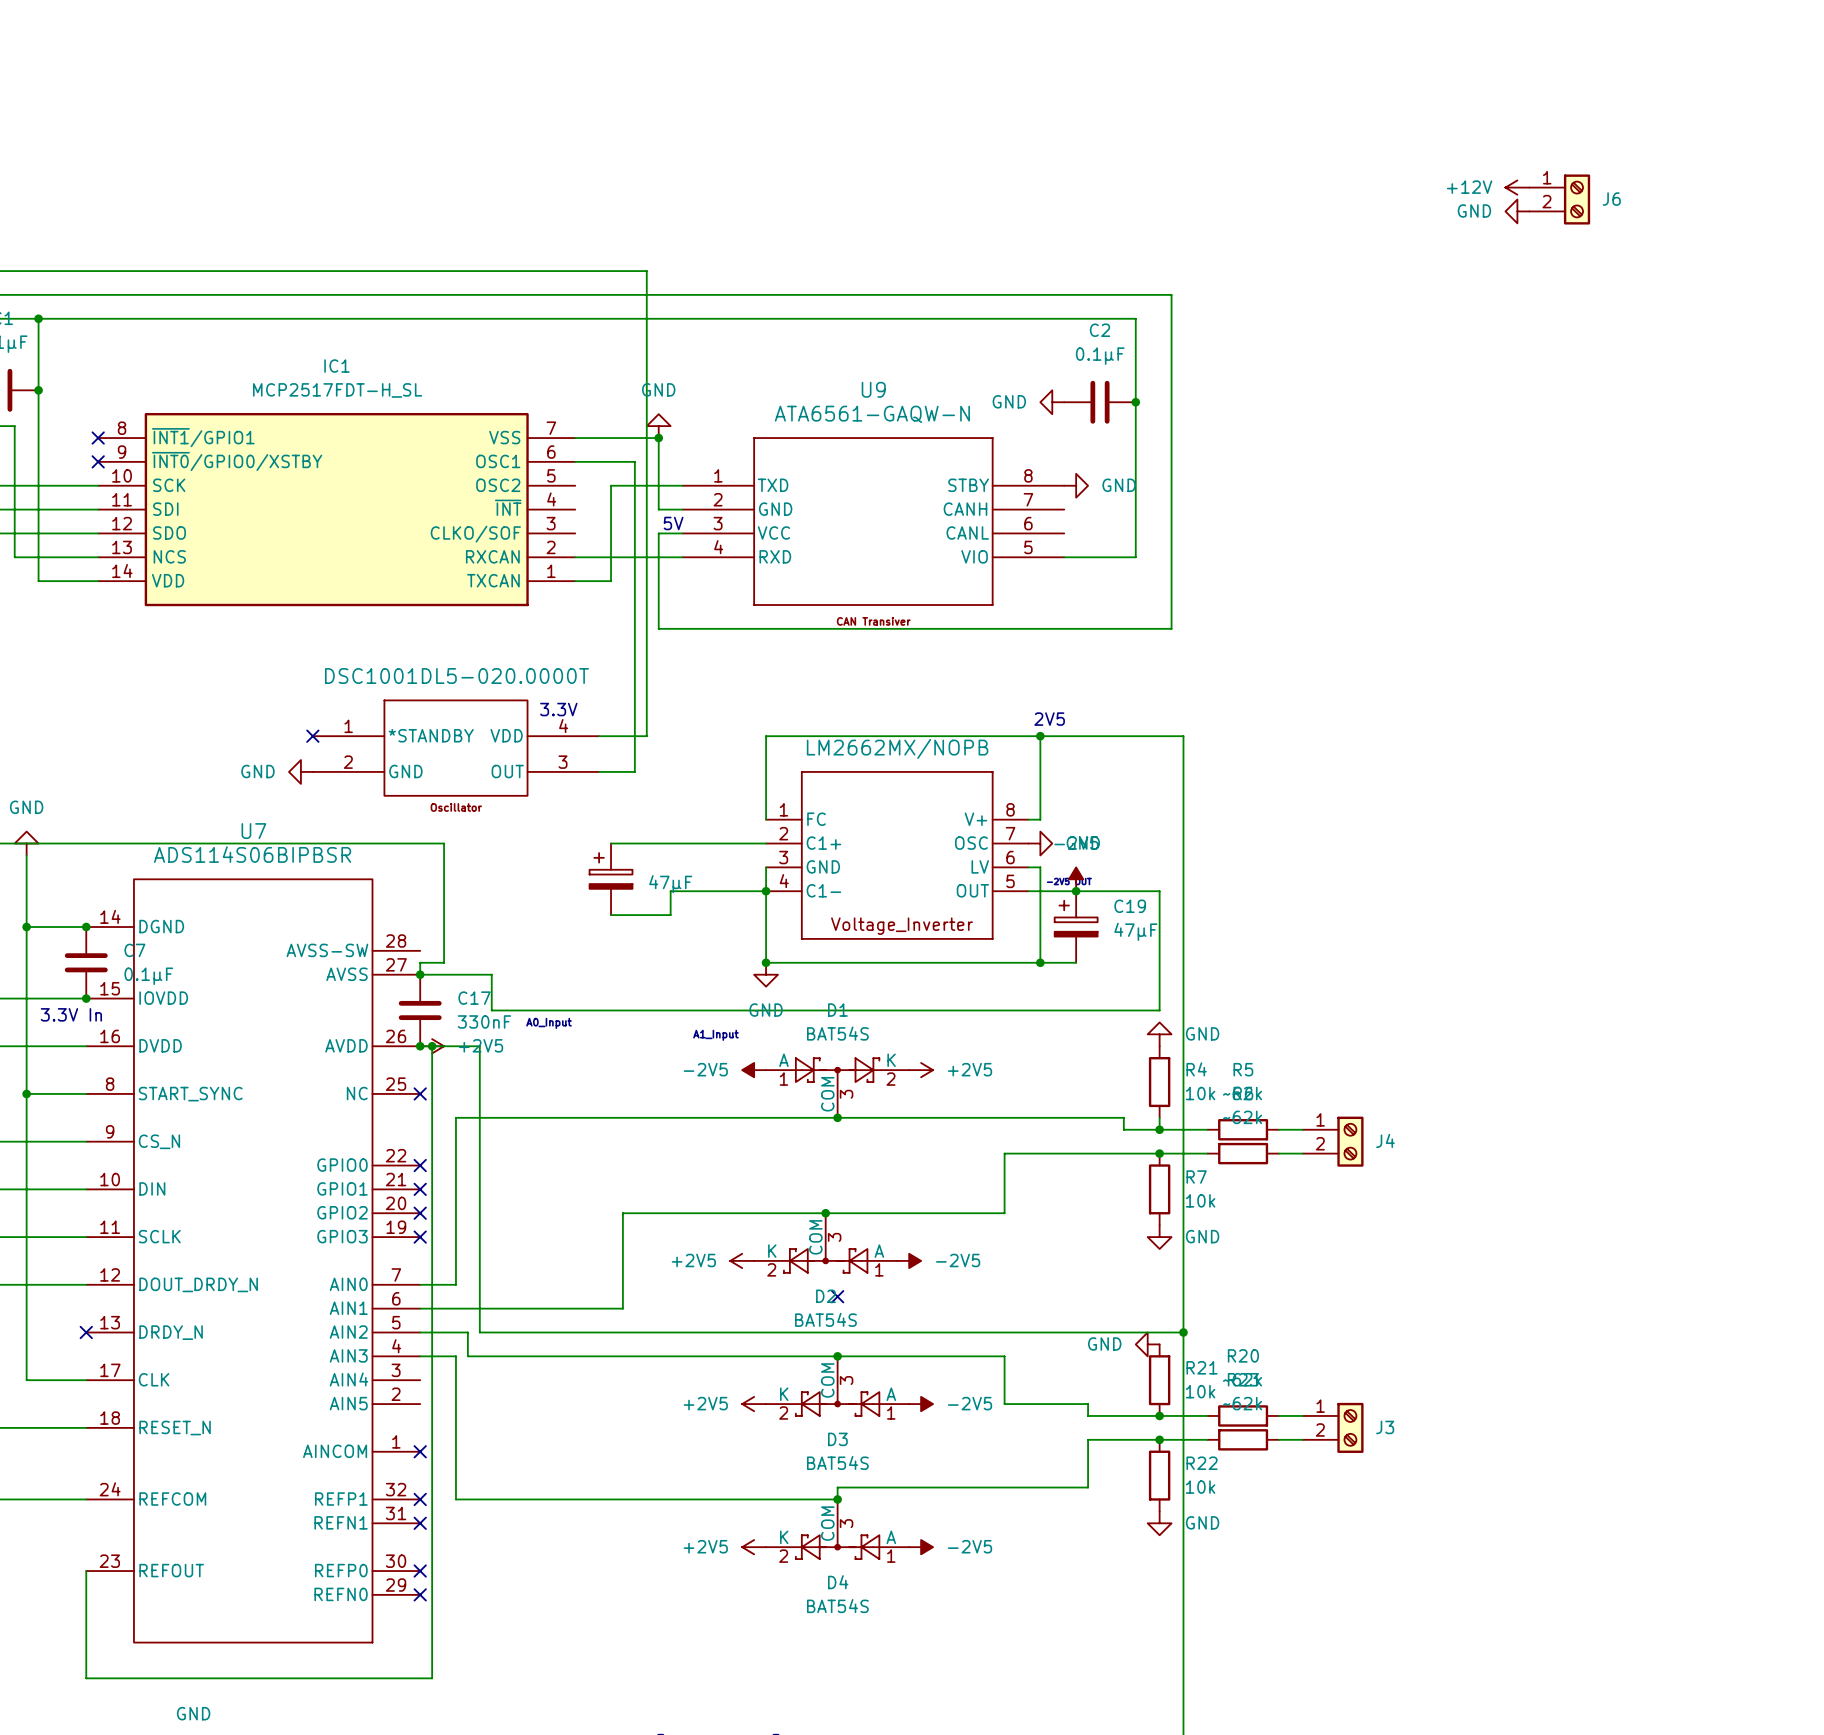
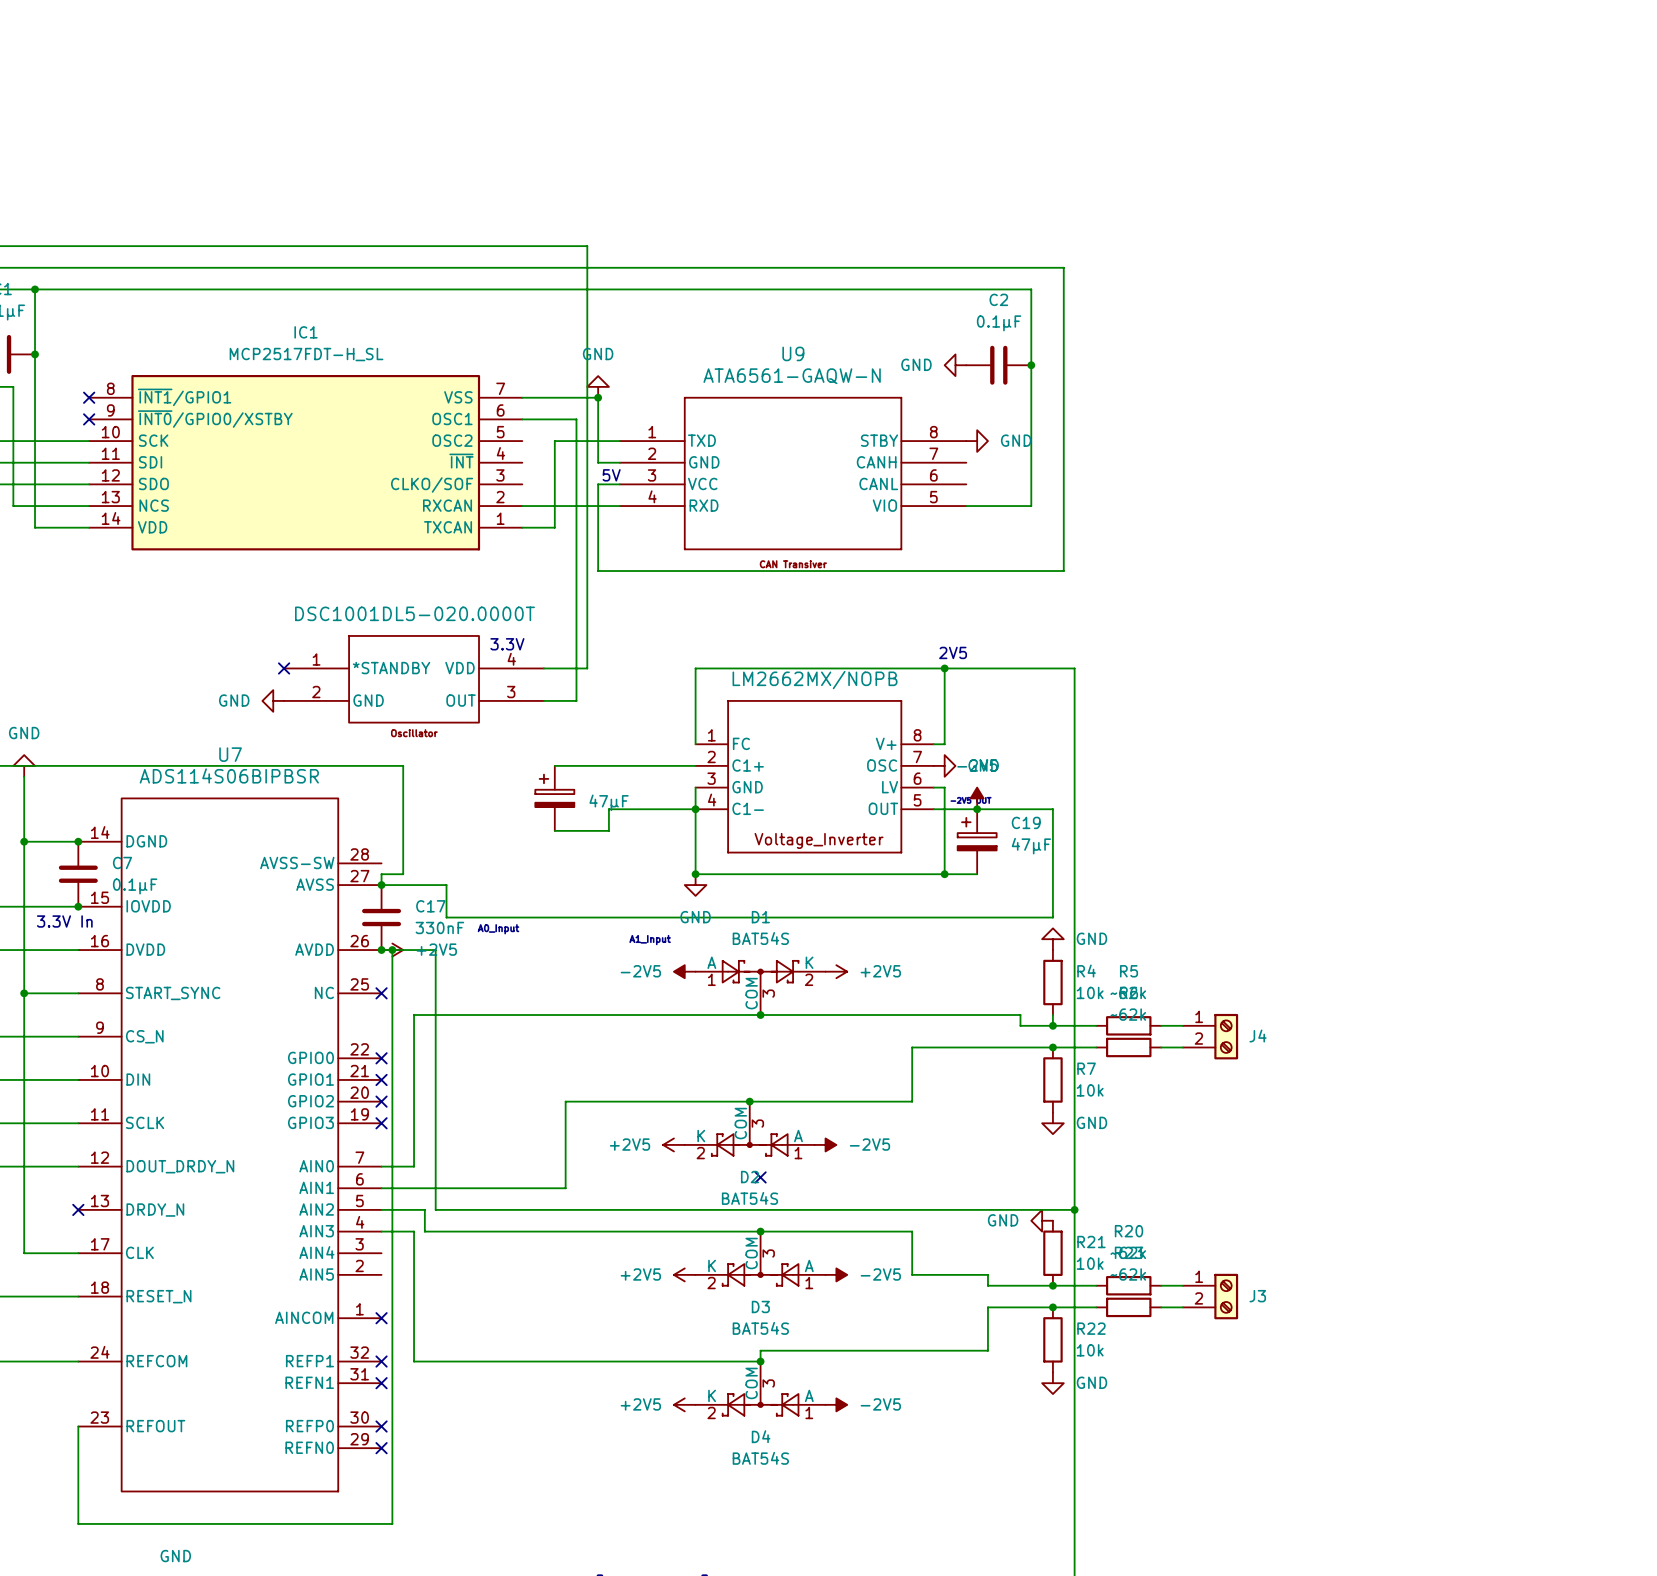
power symbol: +12V (1517, 187) -> none
J6: (1559, 199) -> none
power symbol: GND (1517, 211) -> none

